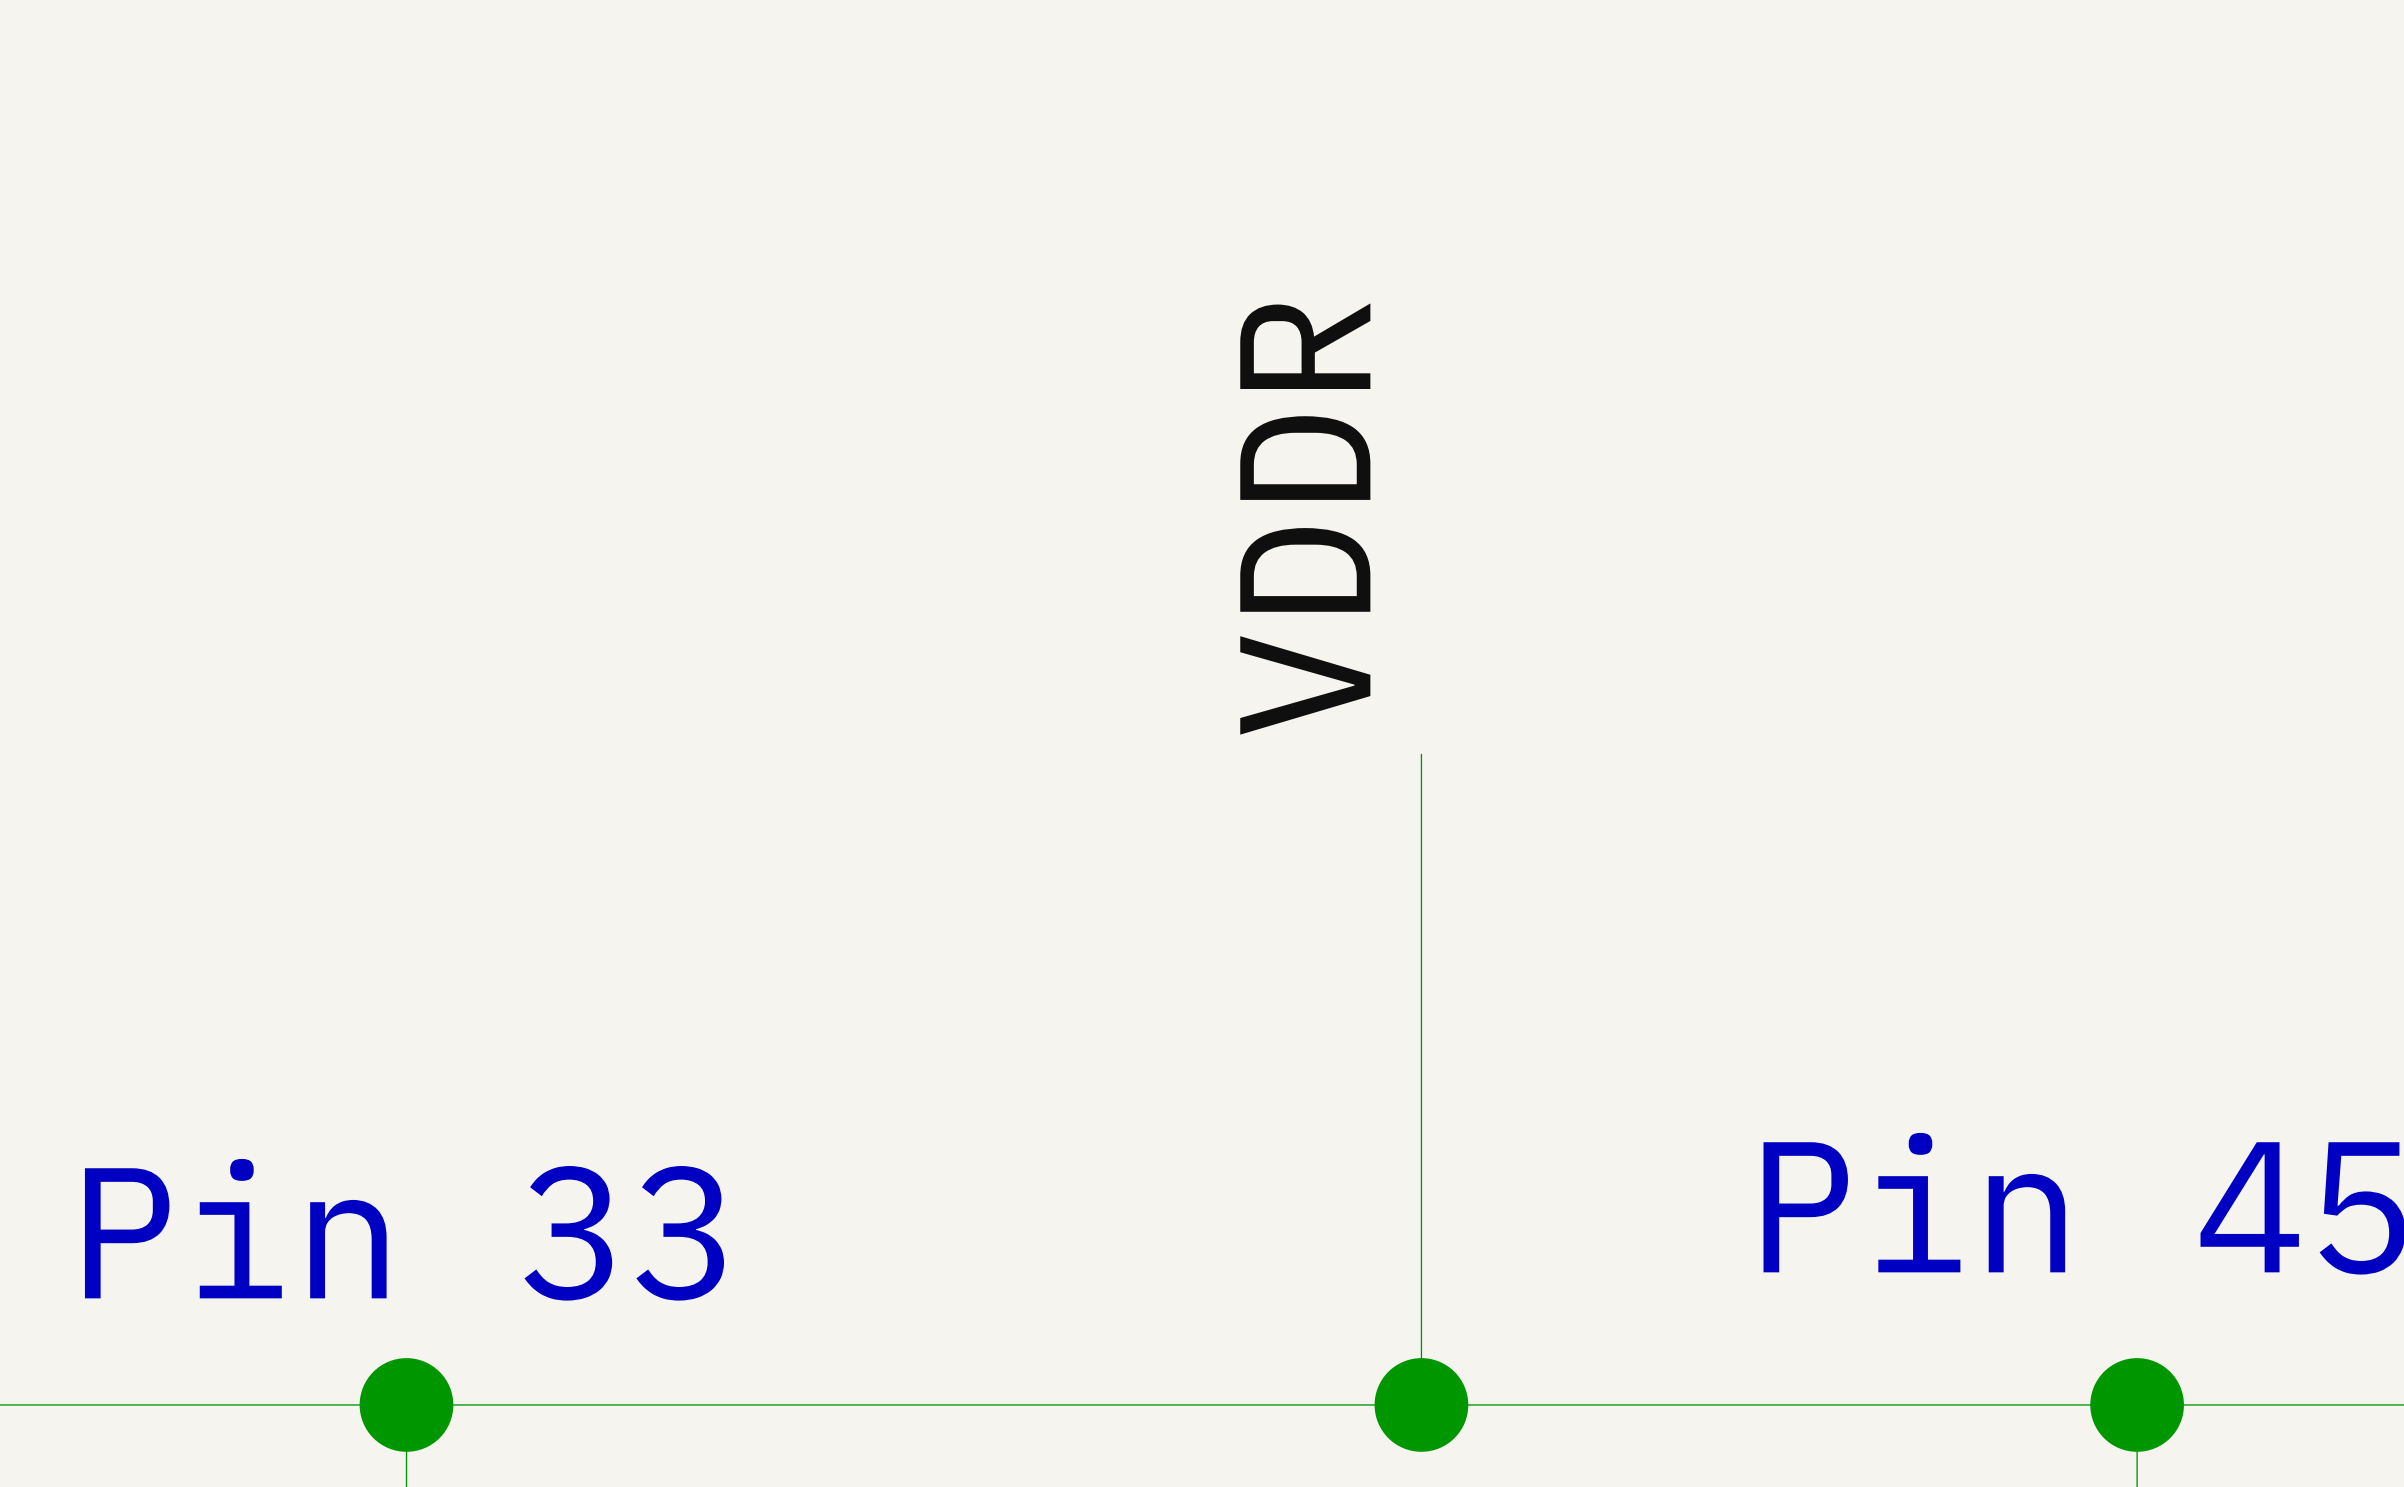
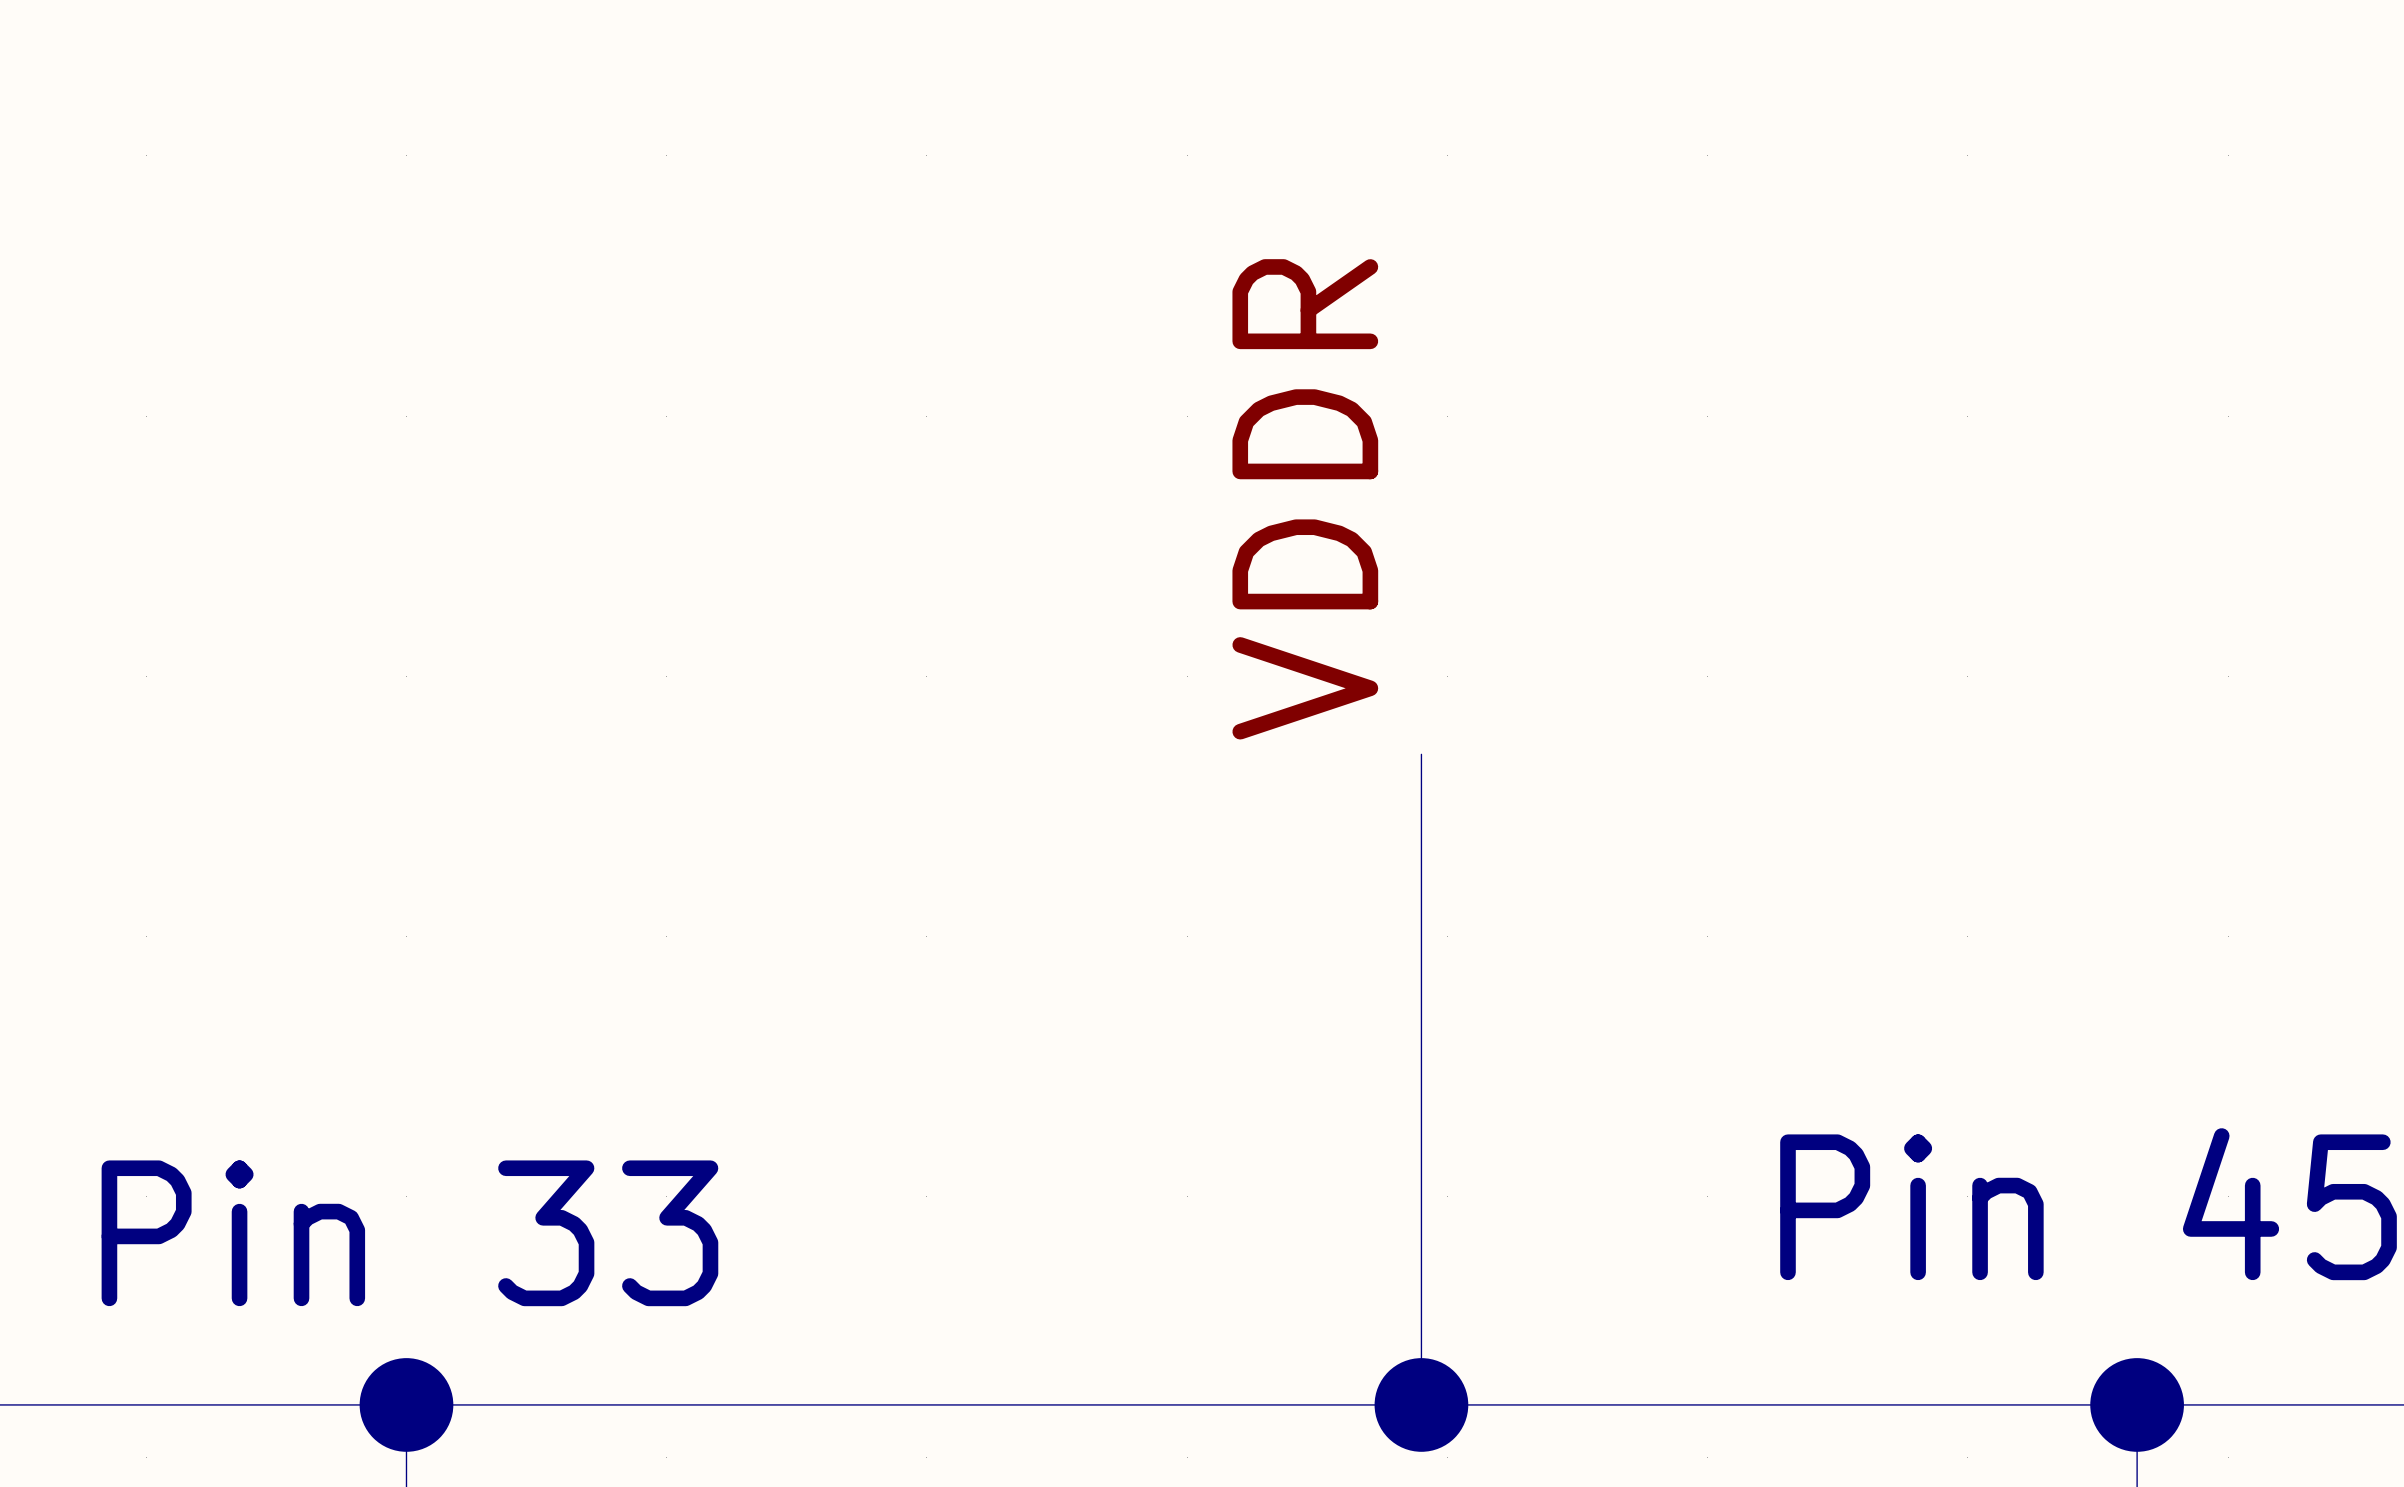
label position: VDDR (1305, 519) -> VDDR (1305, 499)

